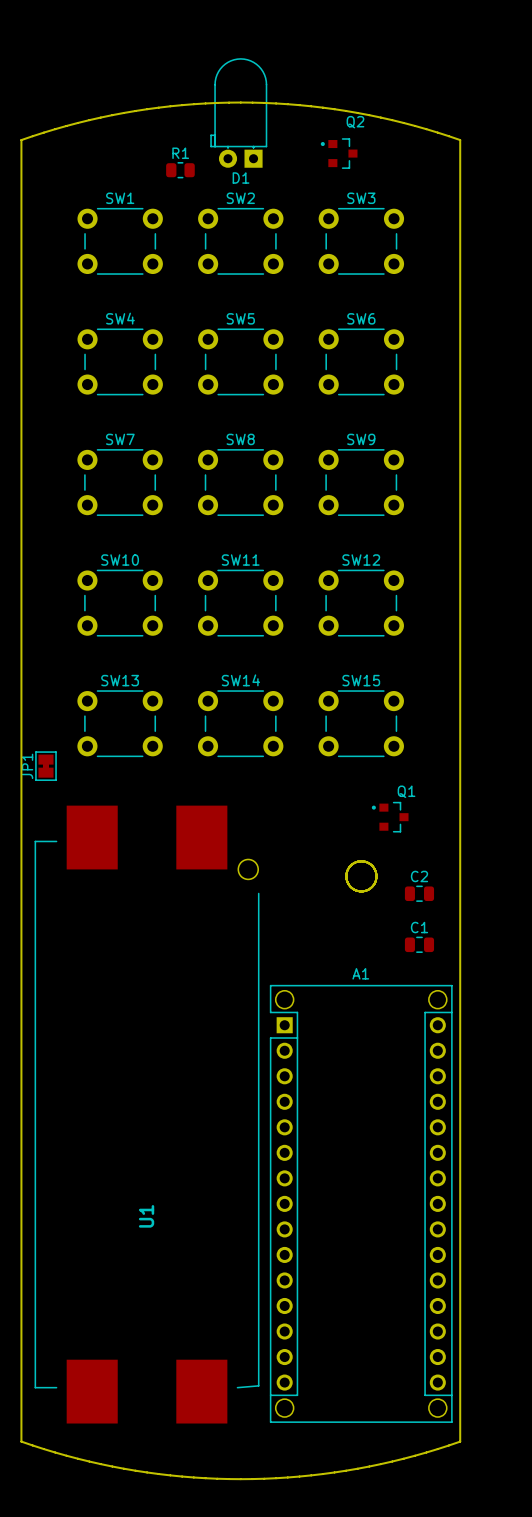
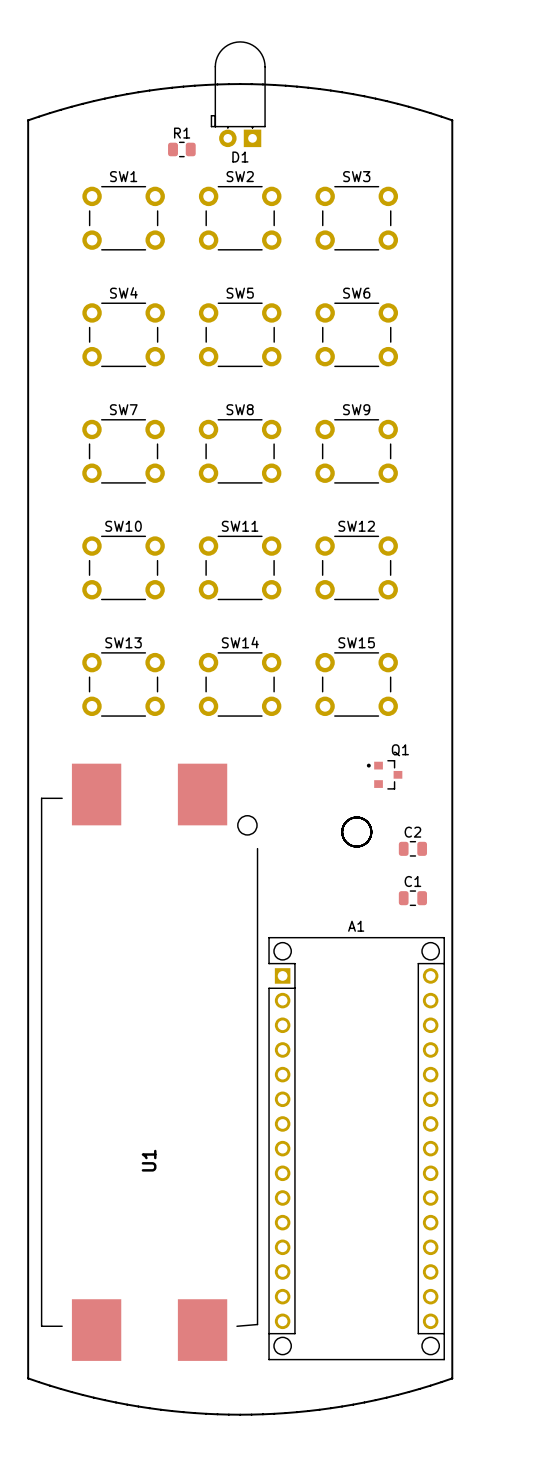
Q2: (339, 153) -> none
JP1: (45, 766) -> none

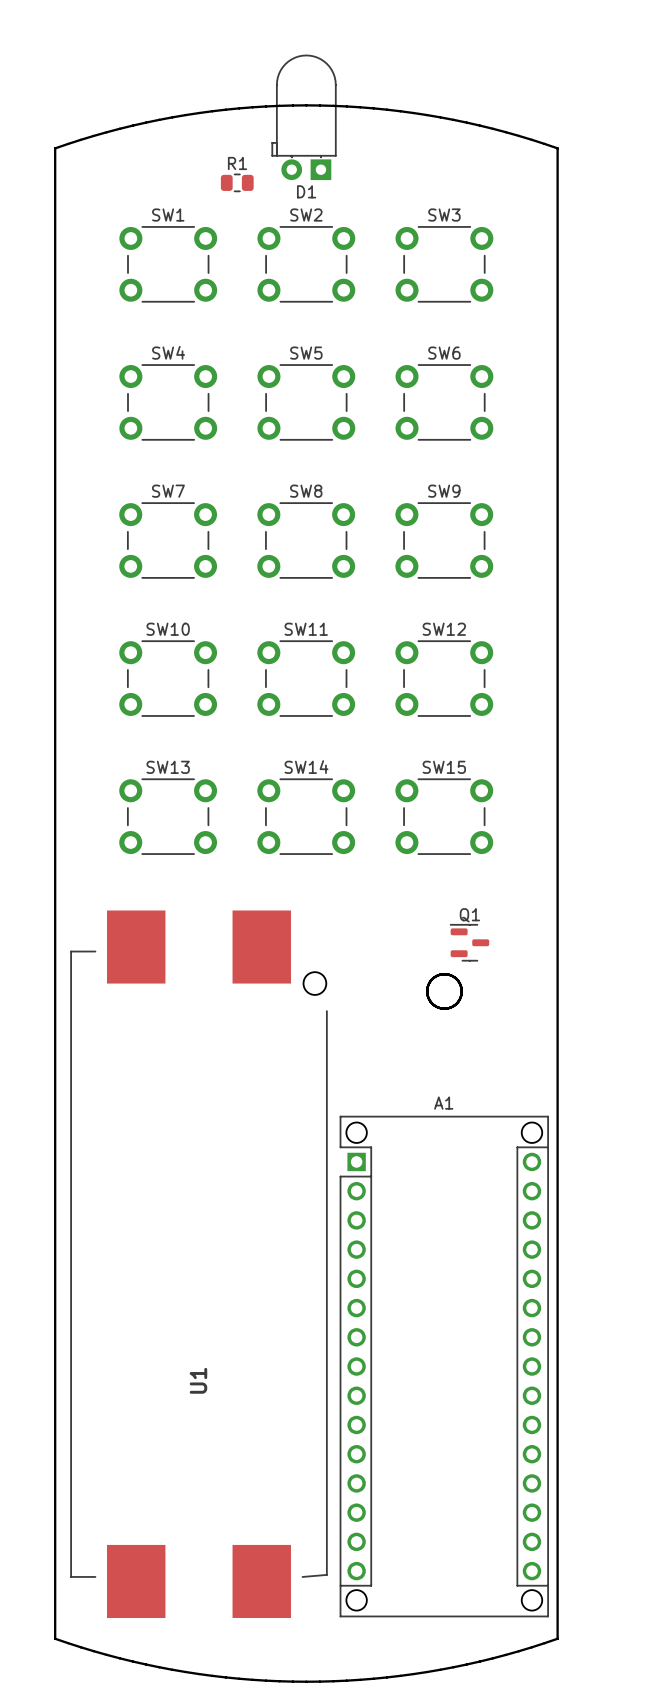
Q1 footprint: [366, 760, 403, 790] -> [449, 924, 490, 962]
C2: (412, 848) -> none
C1: (412, 898) -> none

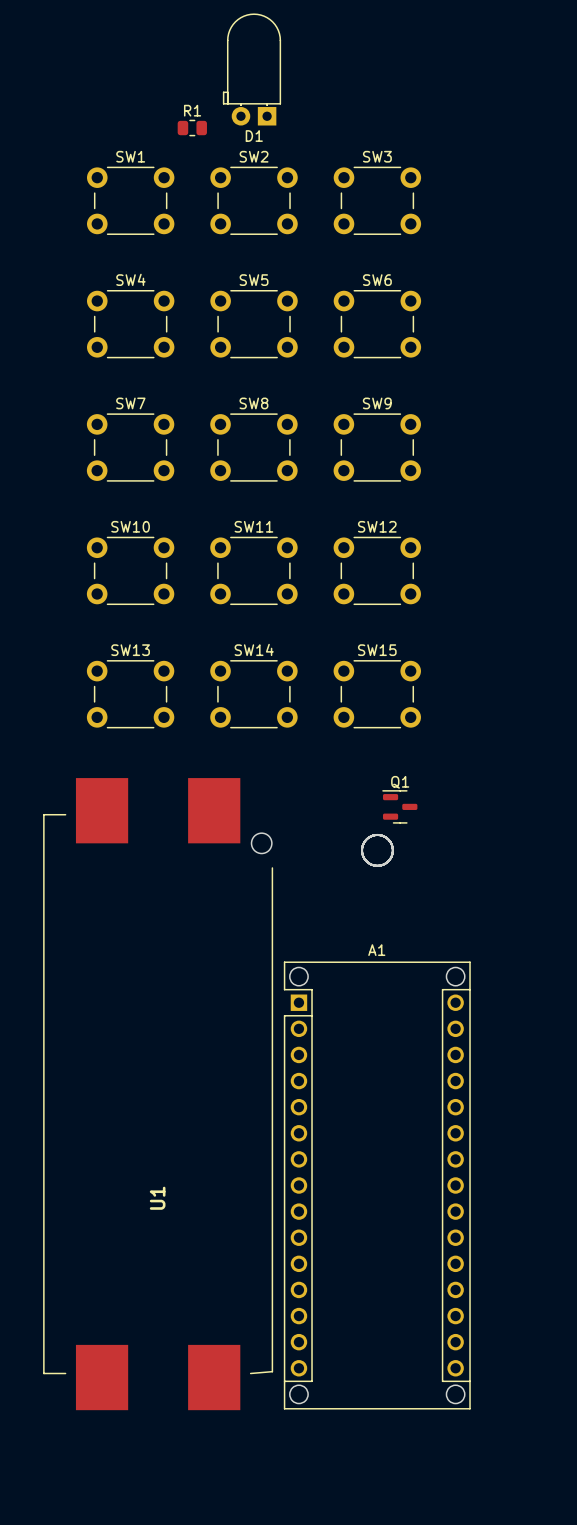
board edge: (55, 148) (55, 1638) -> none
board edge: (55, 148) (106, 132) (172, 117) (239, 108) (306, 105) (373, 108) (440, 117) (505, 132) (557, 148) -> none
board edge: (557, 148) (557, 1638) -> none
board edge: (55, 1638) (119, 1658) (185, 1672) (252, 1679) (306, 1681) (360, 1679) (427, 1672) (492, 1658) (557, 1638) -> none

